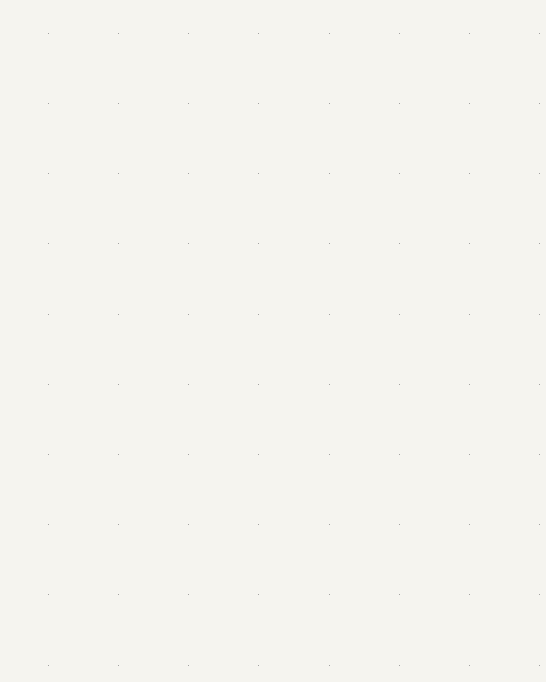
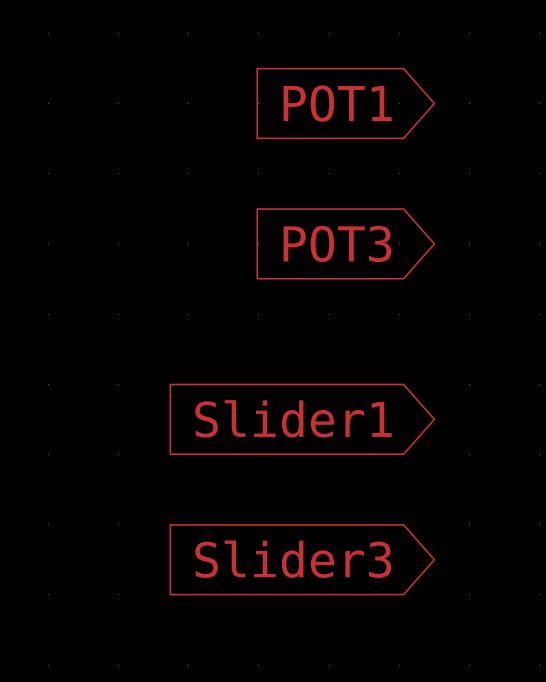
global label: none -> POT1 (337, 103)
global label: none -> POT3 (337, 243)
global label: none -> Slider1 (293, 418)
global label: none -> Slider3 (293, 559)

